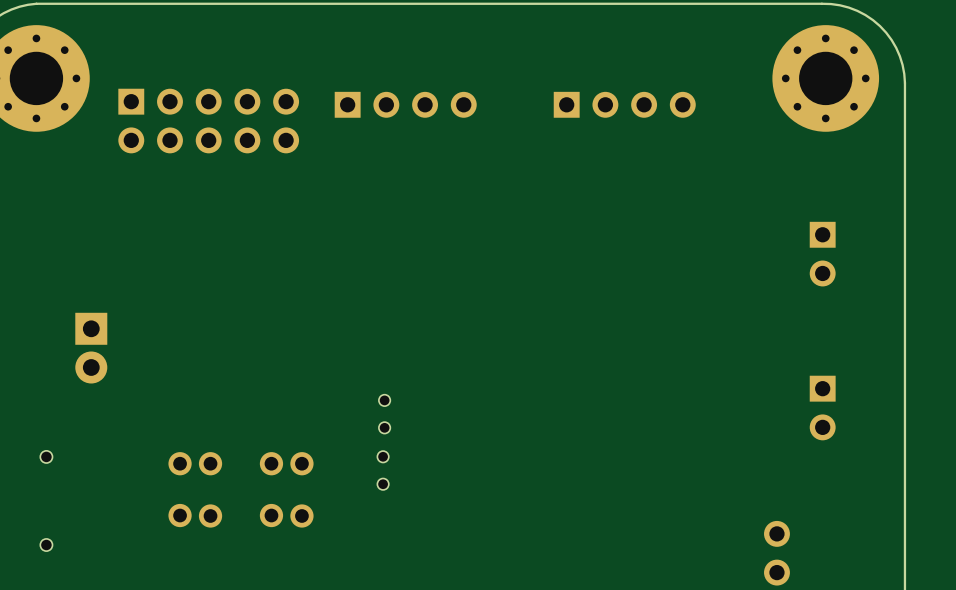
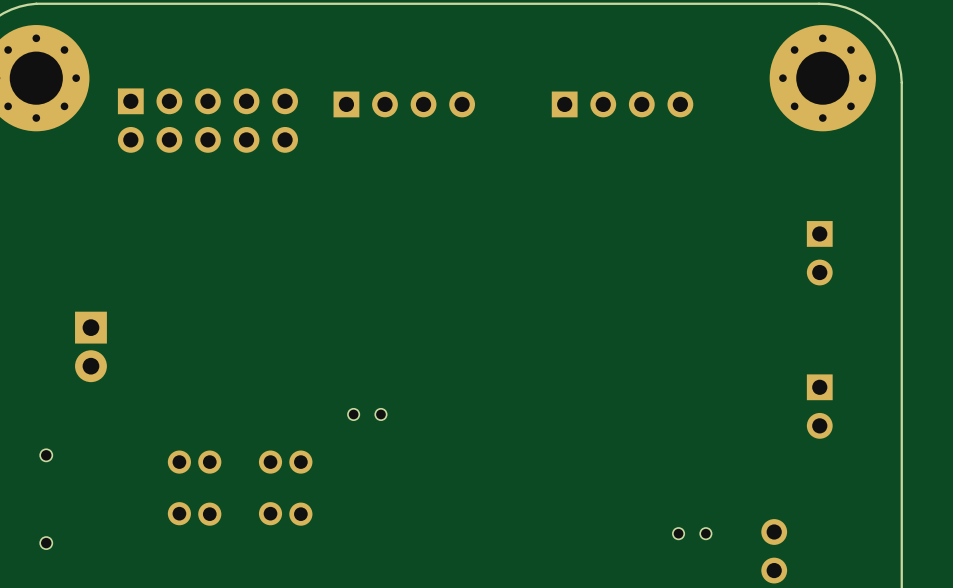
part rotation: 0° (384, 414) -> 90° clockwise (367, 414)
part: (383, 470) -> none
part: none -> (692, 533)

